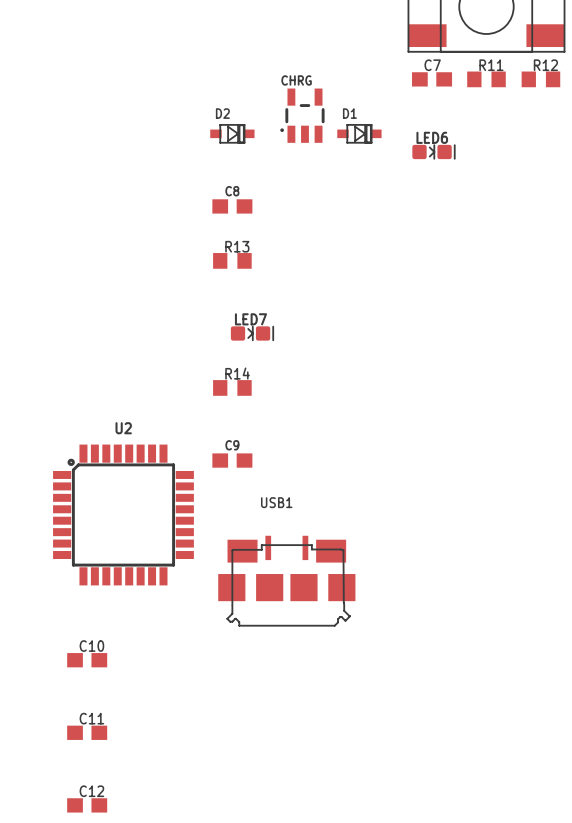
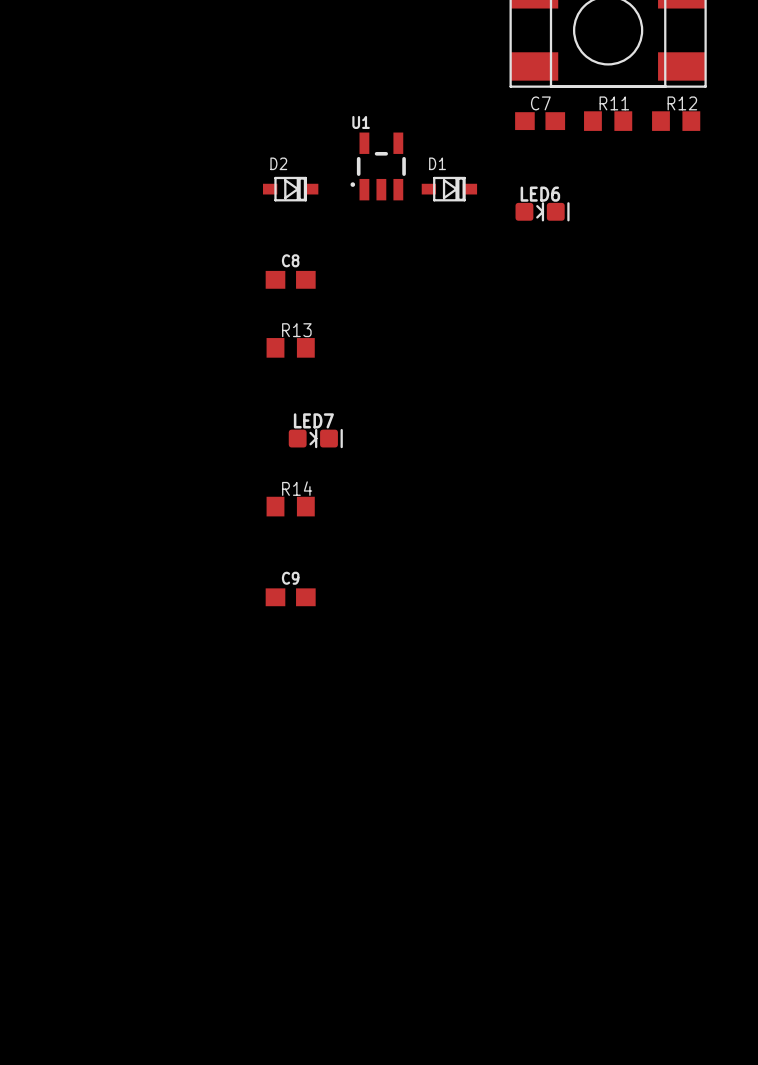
CHRG name: CHRG (296, 80) -> U1 (361, 122)
U2: (123, 514) -> none
USB1: (286, 581) -> none
C10: (87, 660) -> none
C11: (87, 732) -> none
C12: (87, 805) -> none

